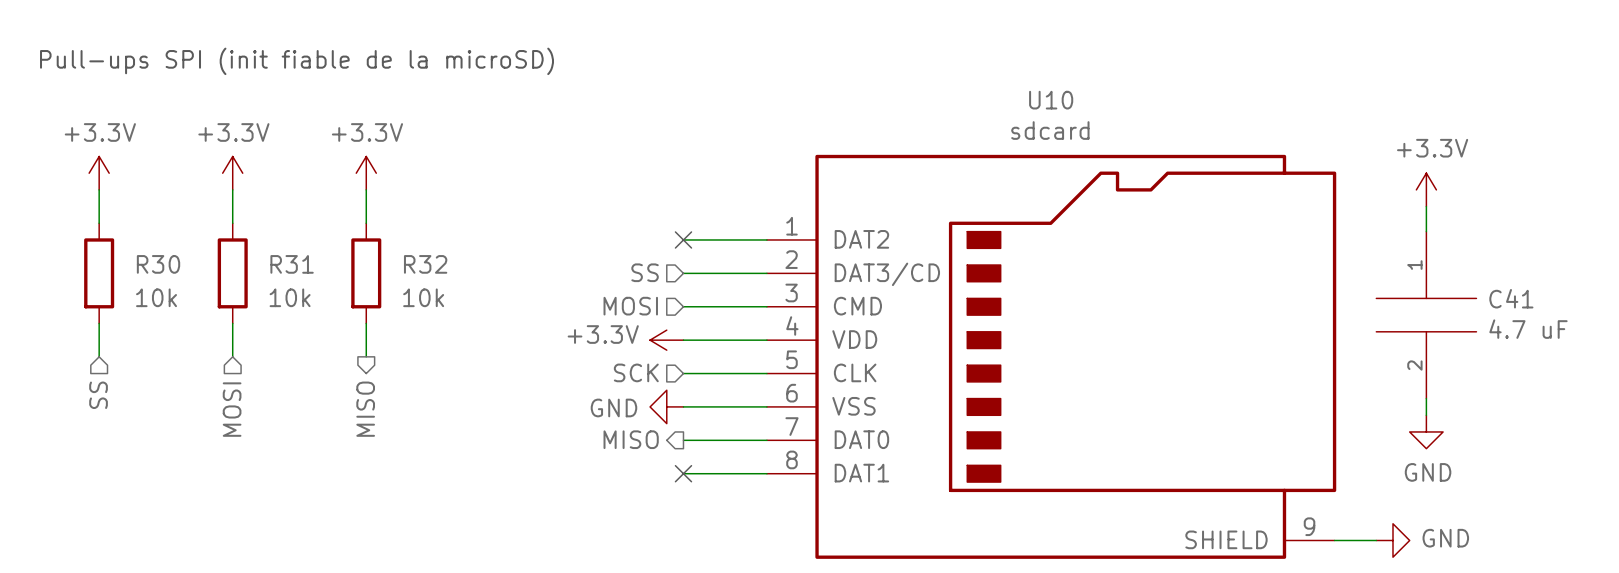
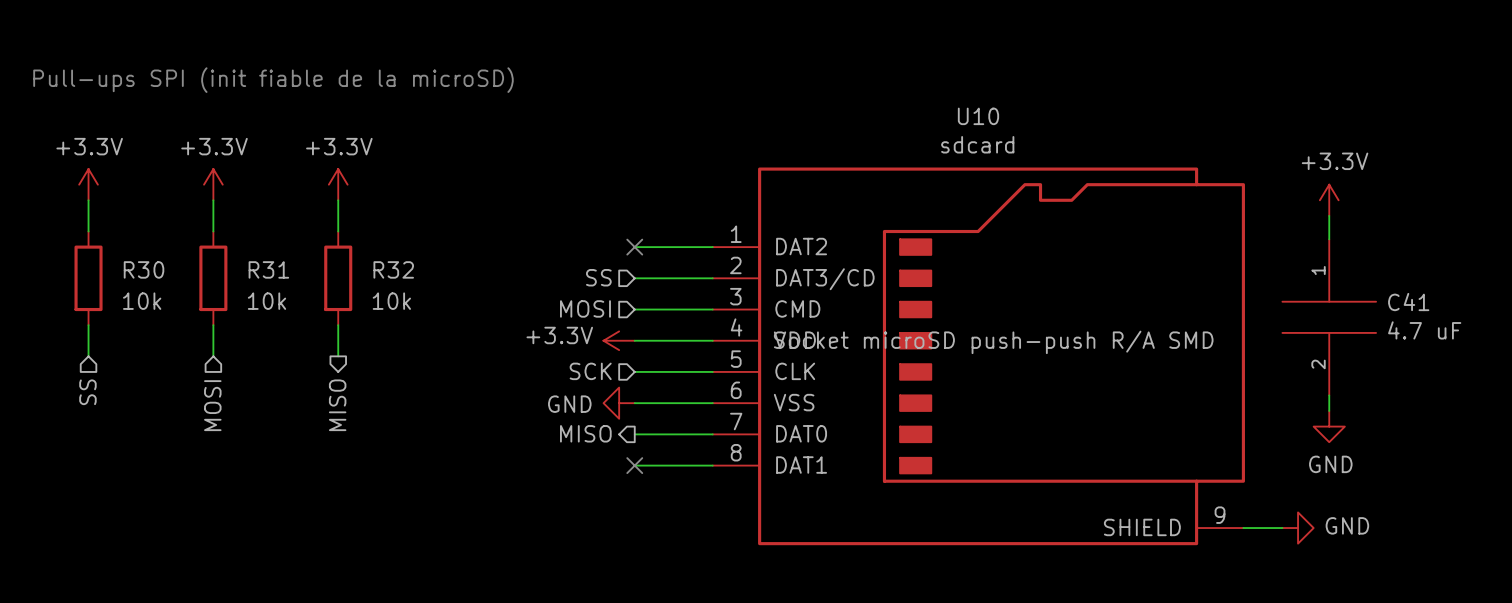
U10 text: none -> Socket microSD push-push R/A SMD (993, 342)

